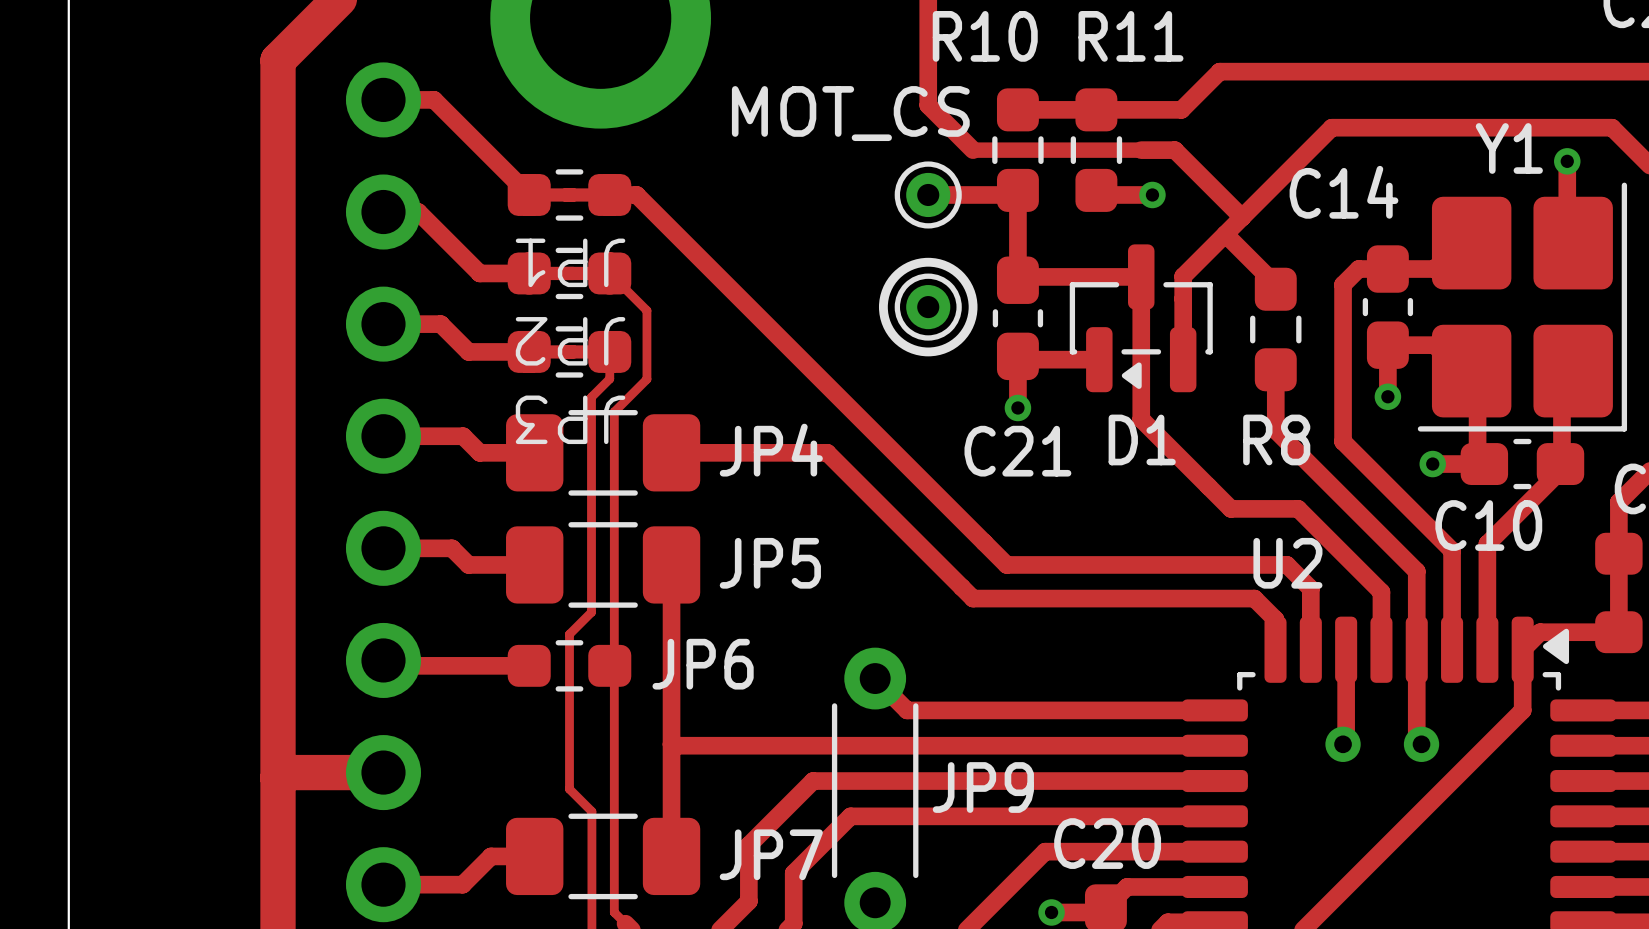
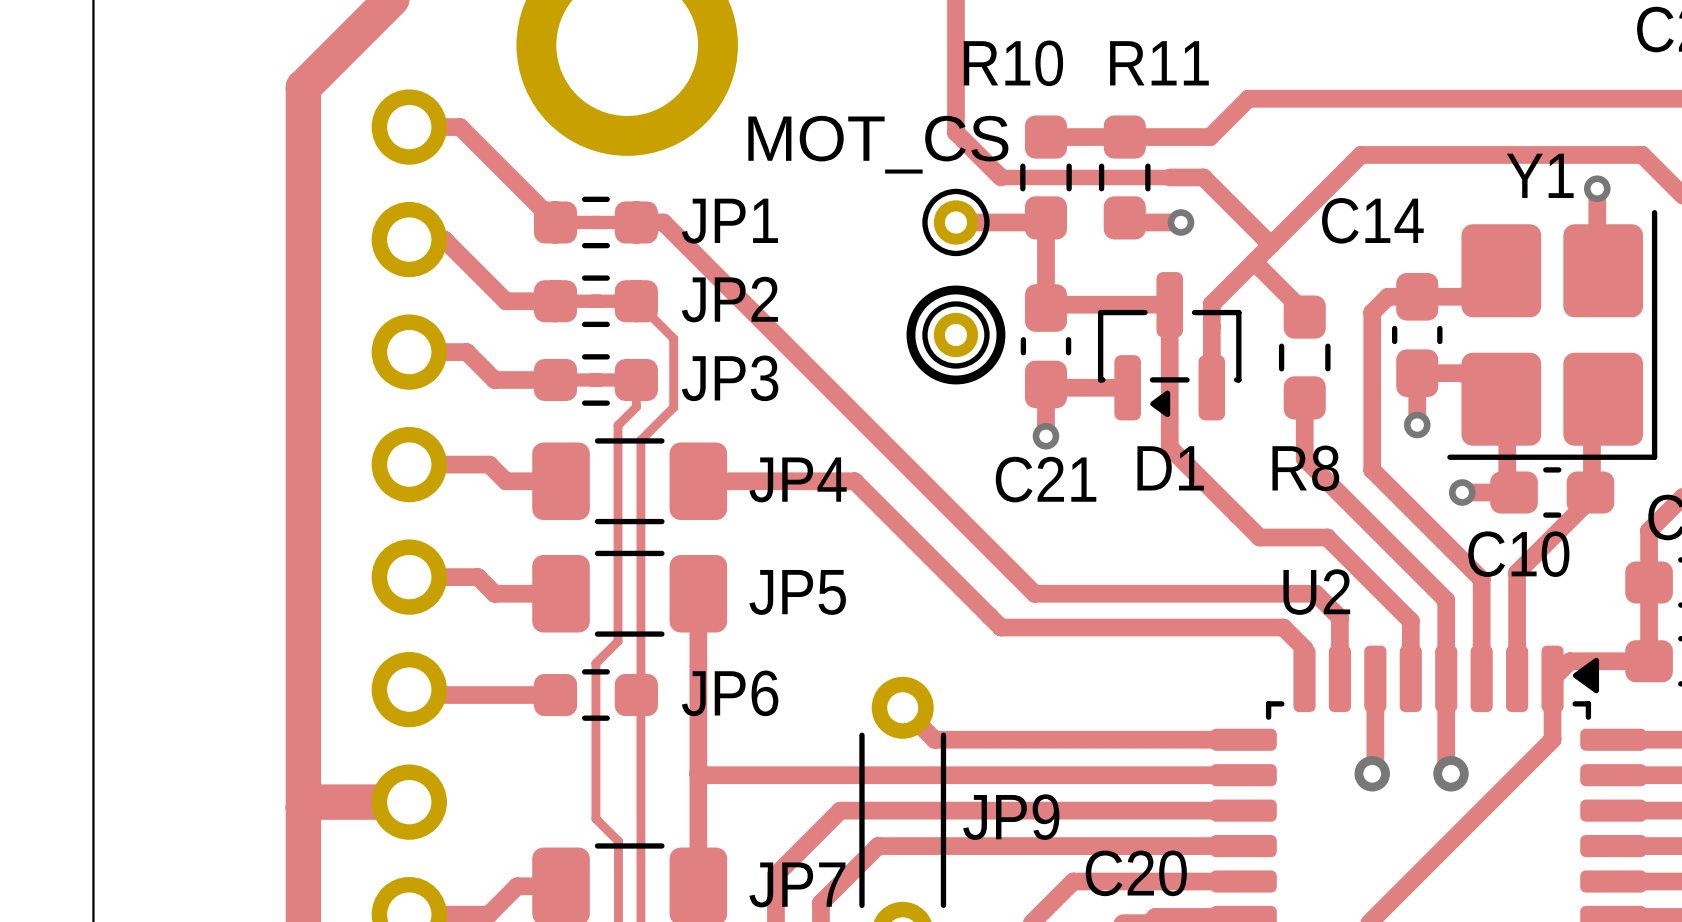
JP1 name rotation: 0° (570, 262) -> 180° (729, 221)
JP1 name position: JP1 (570, 262) -> JP1 (729, 221)
JP2 name rotation: 0° (570, 341) -> 180° (729, 299)
JP2 name position: JP2 (570, 341) -> JP2 (729, 299)
JP3 name rotation: 0° (570, 419) -> 180° (730, 378)
JP3 name position: JP3 (570, 419) -> JP3 (730, 378)

